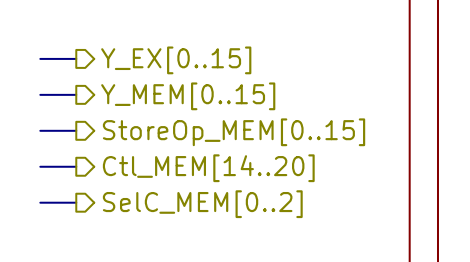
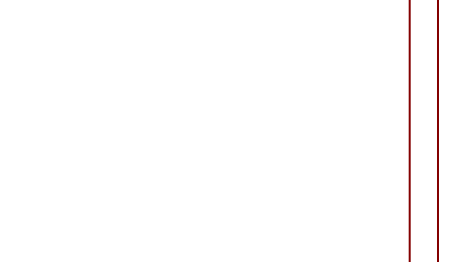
bus: (40, 58) (76, 58) -> none
hierarchical label: Y_EX[0..15] (176, 60) -> none
bus: (40, 94) (76, 94) -> none
hierarchical label: Y_MEM[0..15] (188, 96) -> none
bus: (40, 130) (76, 130) -> none
hierarchical label: StoreOp_MEM[0..15] (234, 132) -> none
bus: (40, 166) (76, 166) -> none
hierarchical label: Ctl_MEM[14..20] (208, 168) -> none
bus: (40, 202) (76, 202) -> none
hierarchical label: SelC_MEM[0..2] (202, 204) -> none

